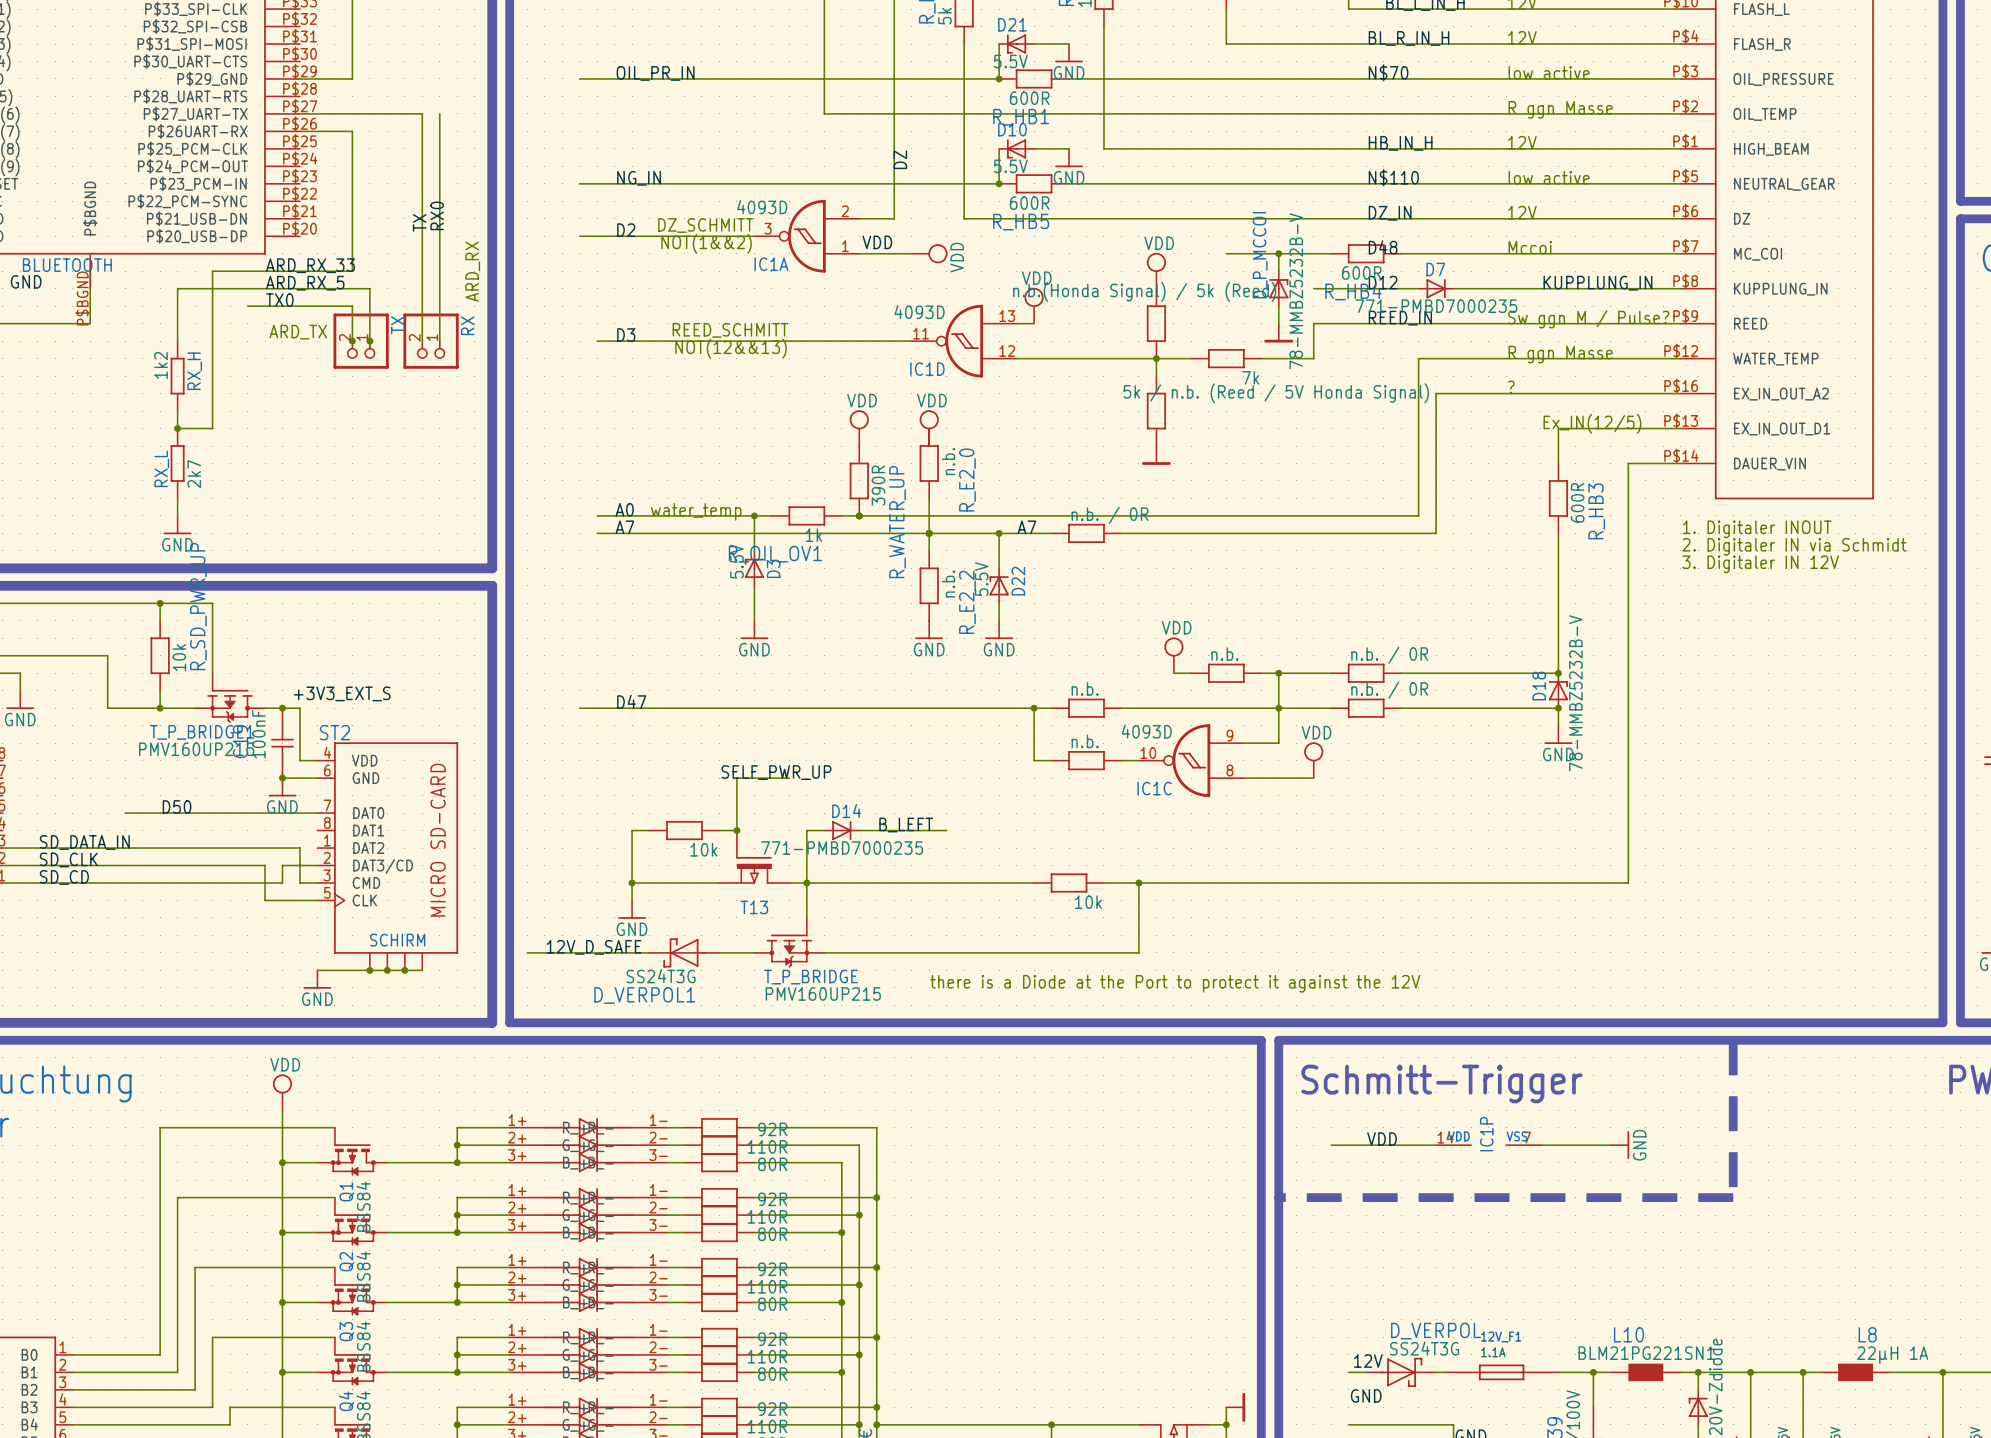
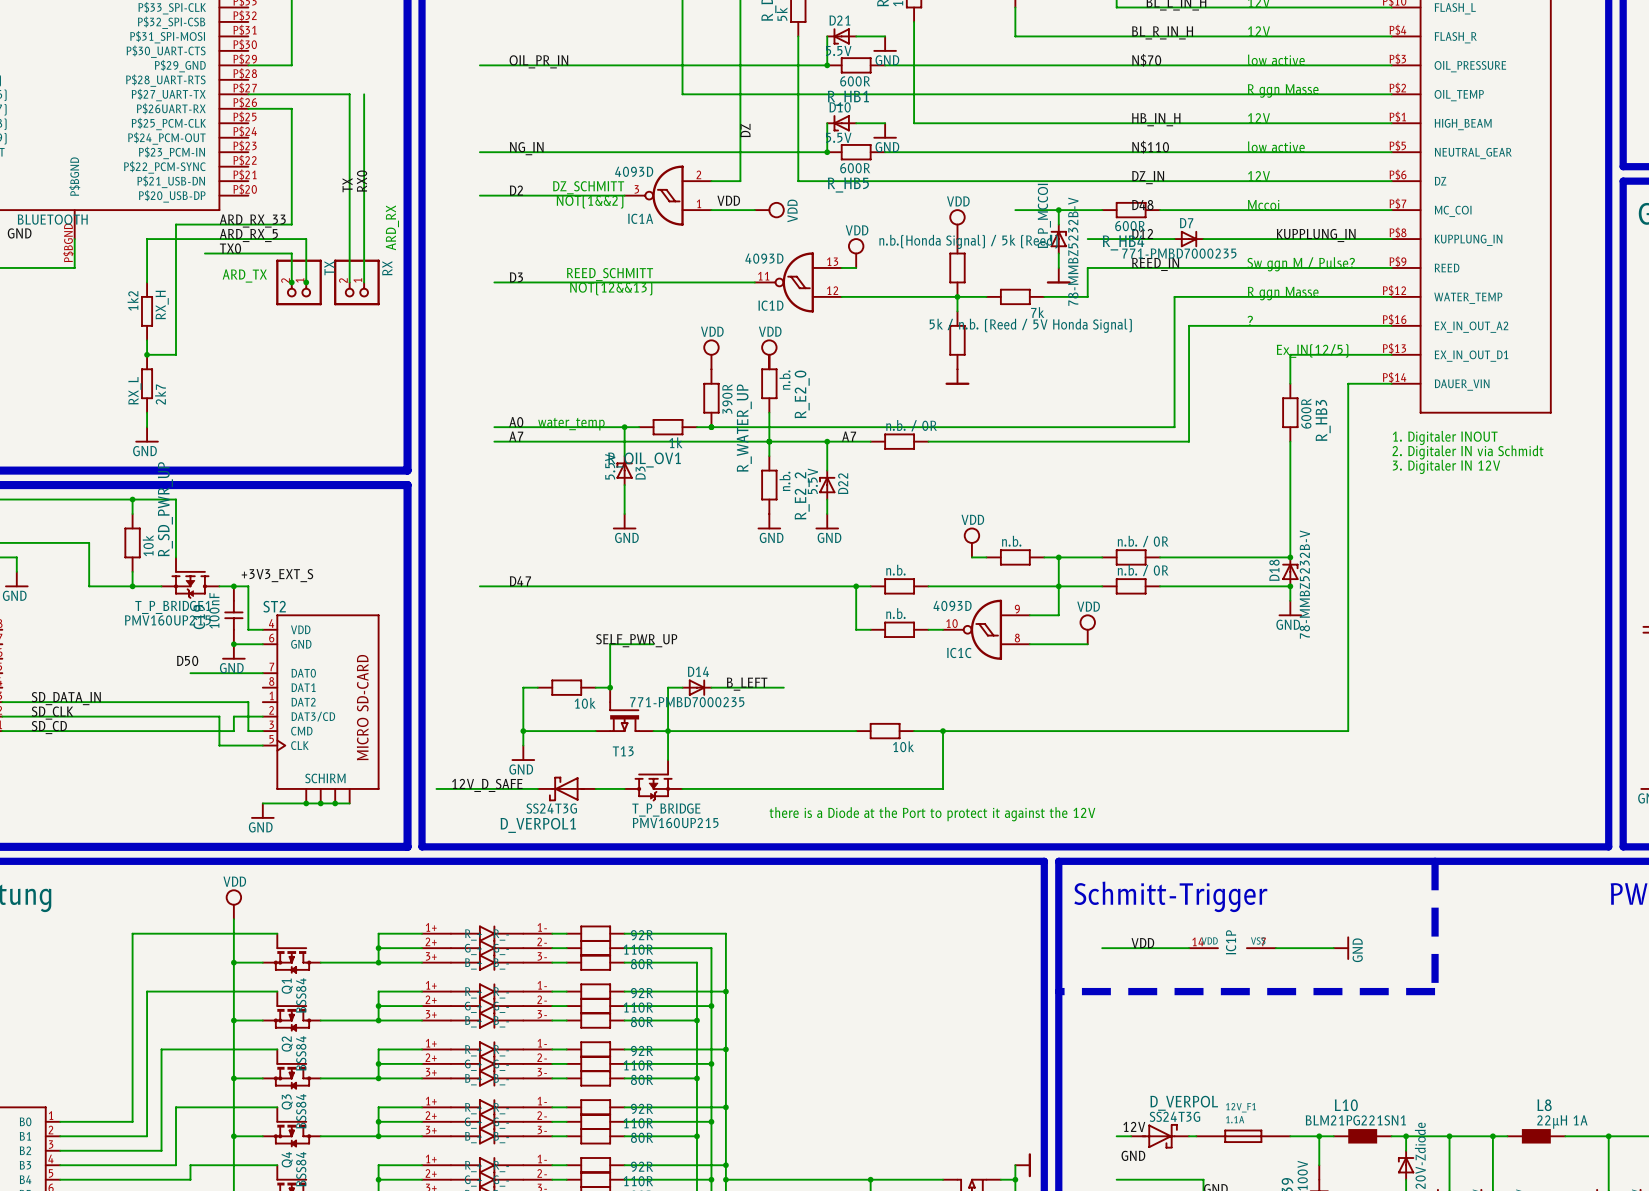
label position: D50 (177, 806) -> D50 (187, 660)
wire: (125, 813) (230, 813) -> none

